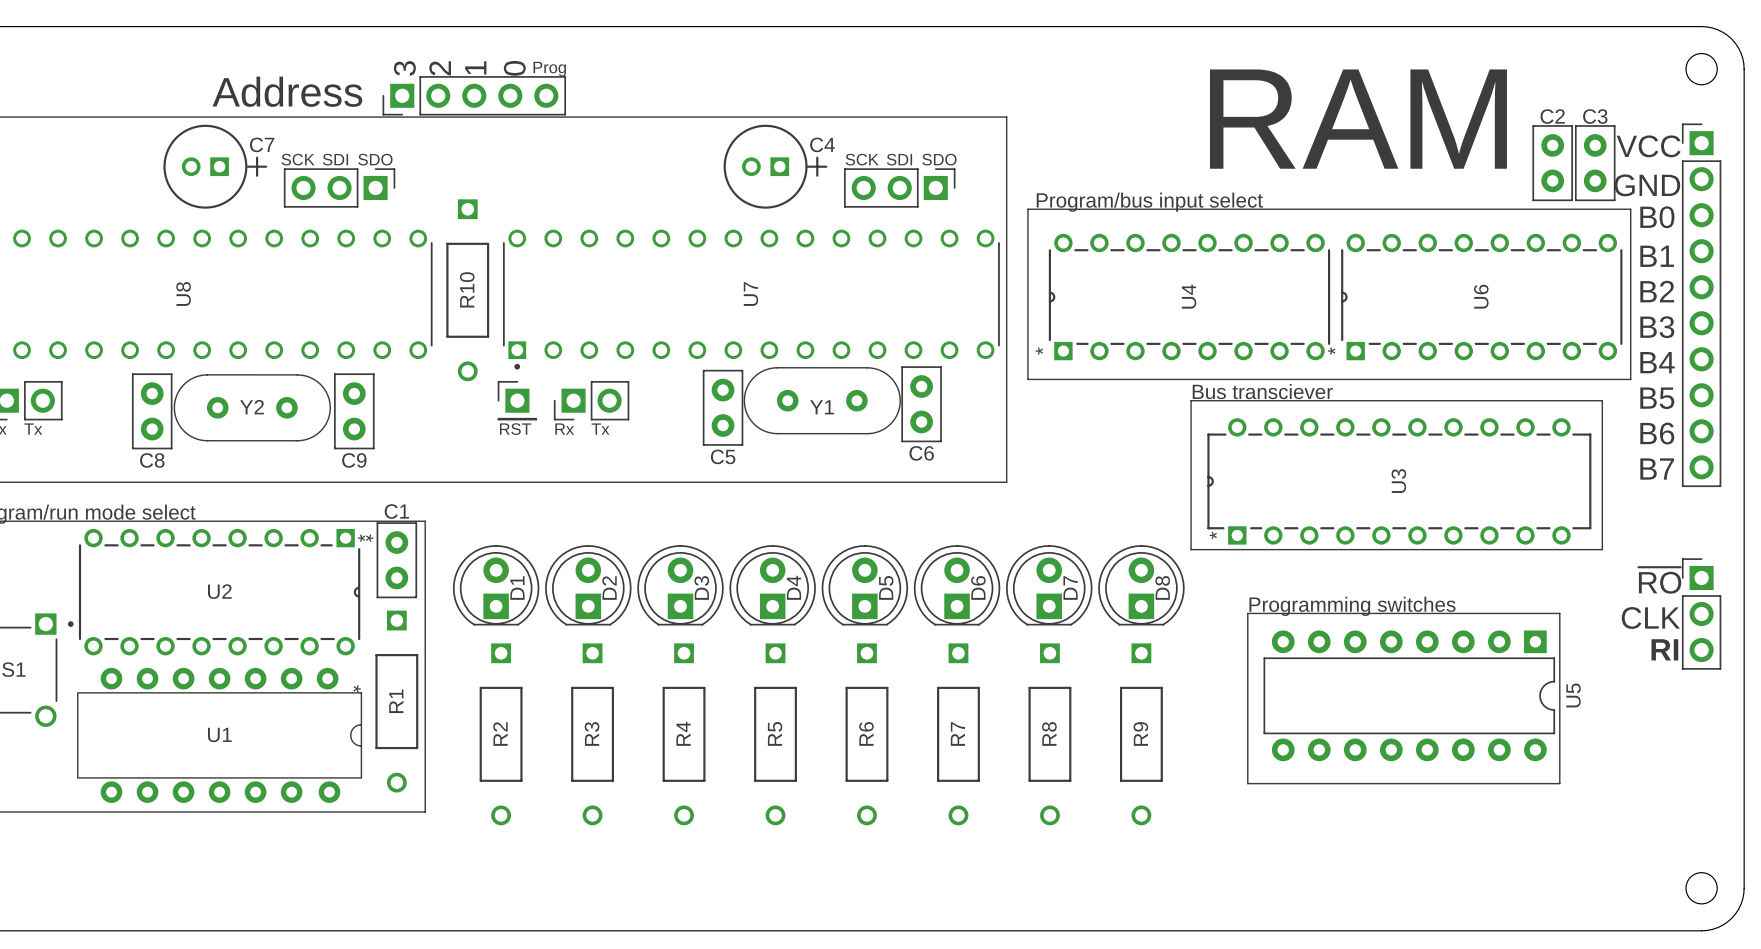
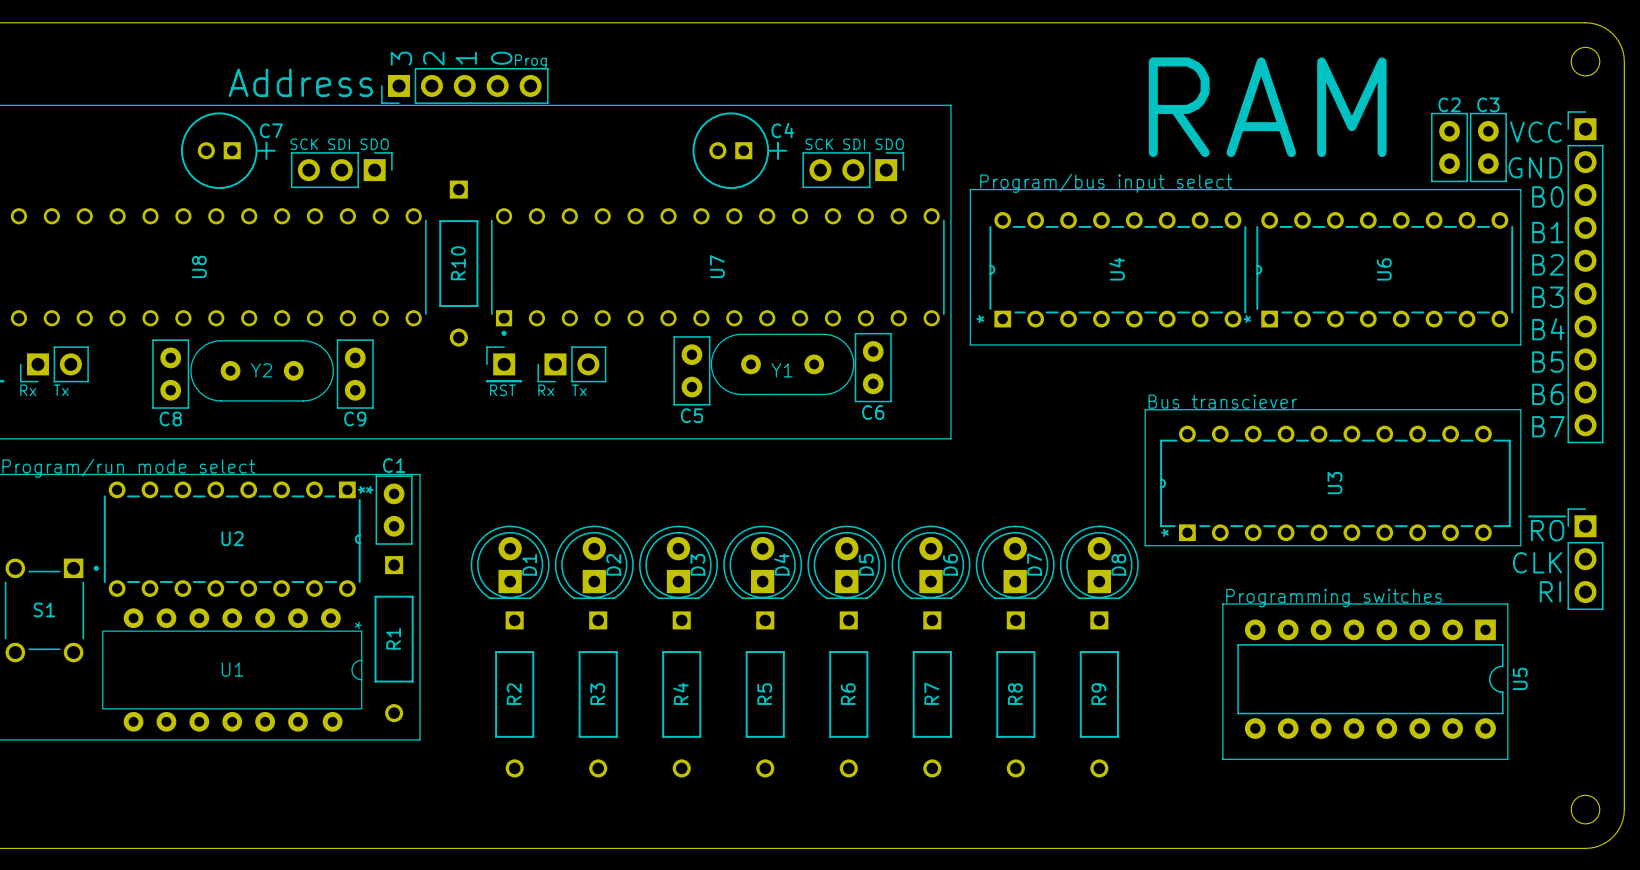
text position: Bus transciever (1262, 391) -> Bus transciever (1222, 401)
line: (1191, 400) (1602, 400) (1602, 549) (1191, 549) (1191, 400) -> (1145, 409) (1520, 409) (1520, 545) (1145, 545) (1145, 409)
U3 position: (1399, 481) -> (1335, 483)
D1 position: (496, 585) -> (510, 562)
D2 position: (588, 585) -> (594, 562)
D3 position: (680, 585) -> (678, 562)
D4 position: (772, 585) -> (762, 562)
D5 position: (864, 585) -> (846, 562)
D6 position: (957, 585) -> (931, 562)
D7 position: (1049, 585) -> (1015, 562)
D8 position: (1141, 585) -> (1099, 562)
text position: Programming switches (1352, 606) -> Programming switches (1334, 598)
line: (1247, 613) (1559, 613) (1559, 783) (1247, 783) (1247, 613) -> (1222, 603) (1507, 603) (1507, 759) (1222, 759) (1222, 603)
U5 position: (1409, 695) -> (1370, 679)
R2 position: (501, 734) -> (514, 694)
R3 position: (592, 734) -> (598, 694)
R4 position: (684, 734) -> (681, 694)
R5 position: (775, 734) -> (765, 694)
R6 position: (866, 734) -> (848, 694)
R7 position: (958, 734) -> (932, 694)
R8 position: (1049, 734) -> (1015, 694)
R9 position: (1141, 734) -> (1099, 694)

